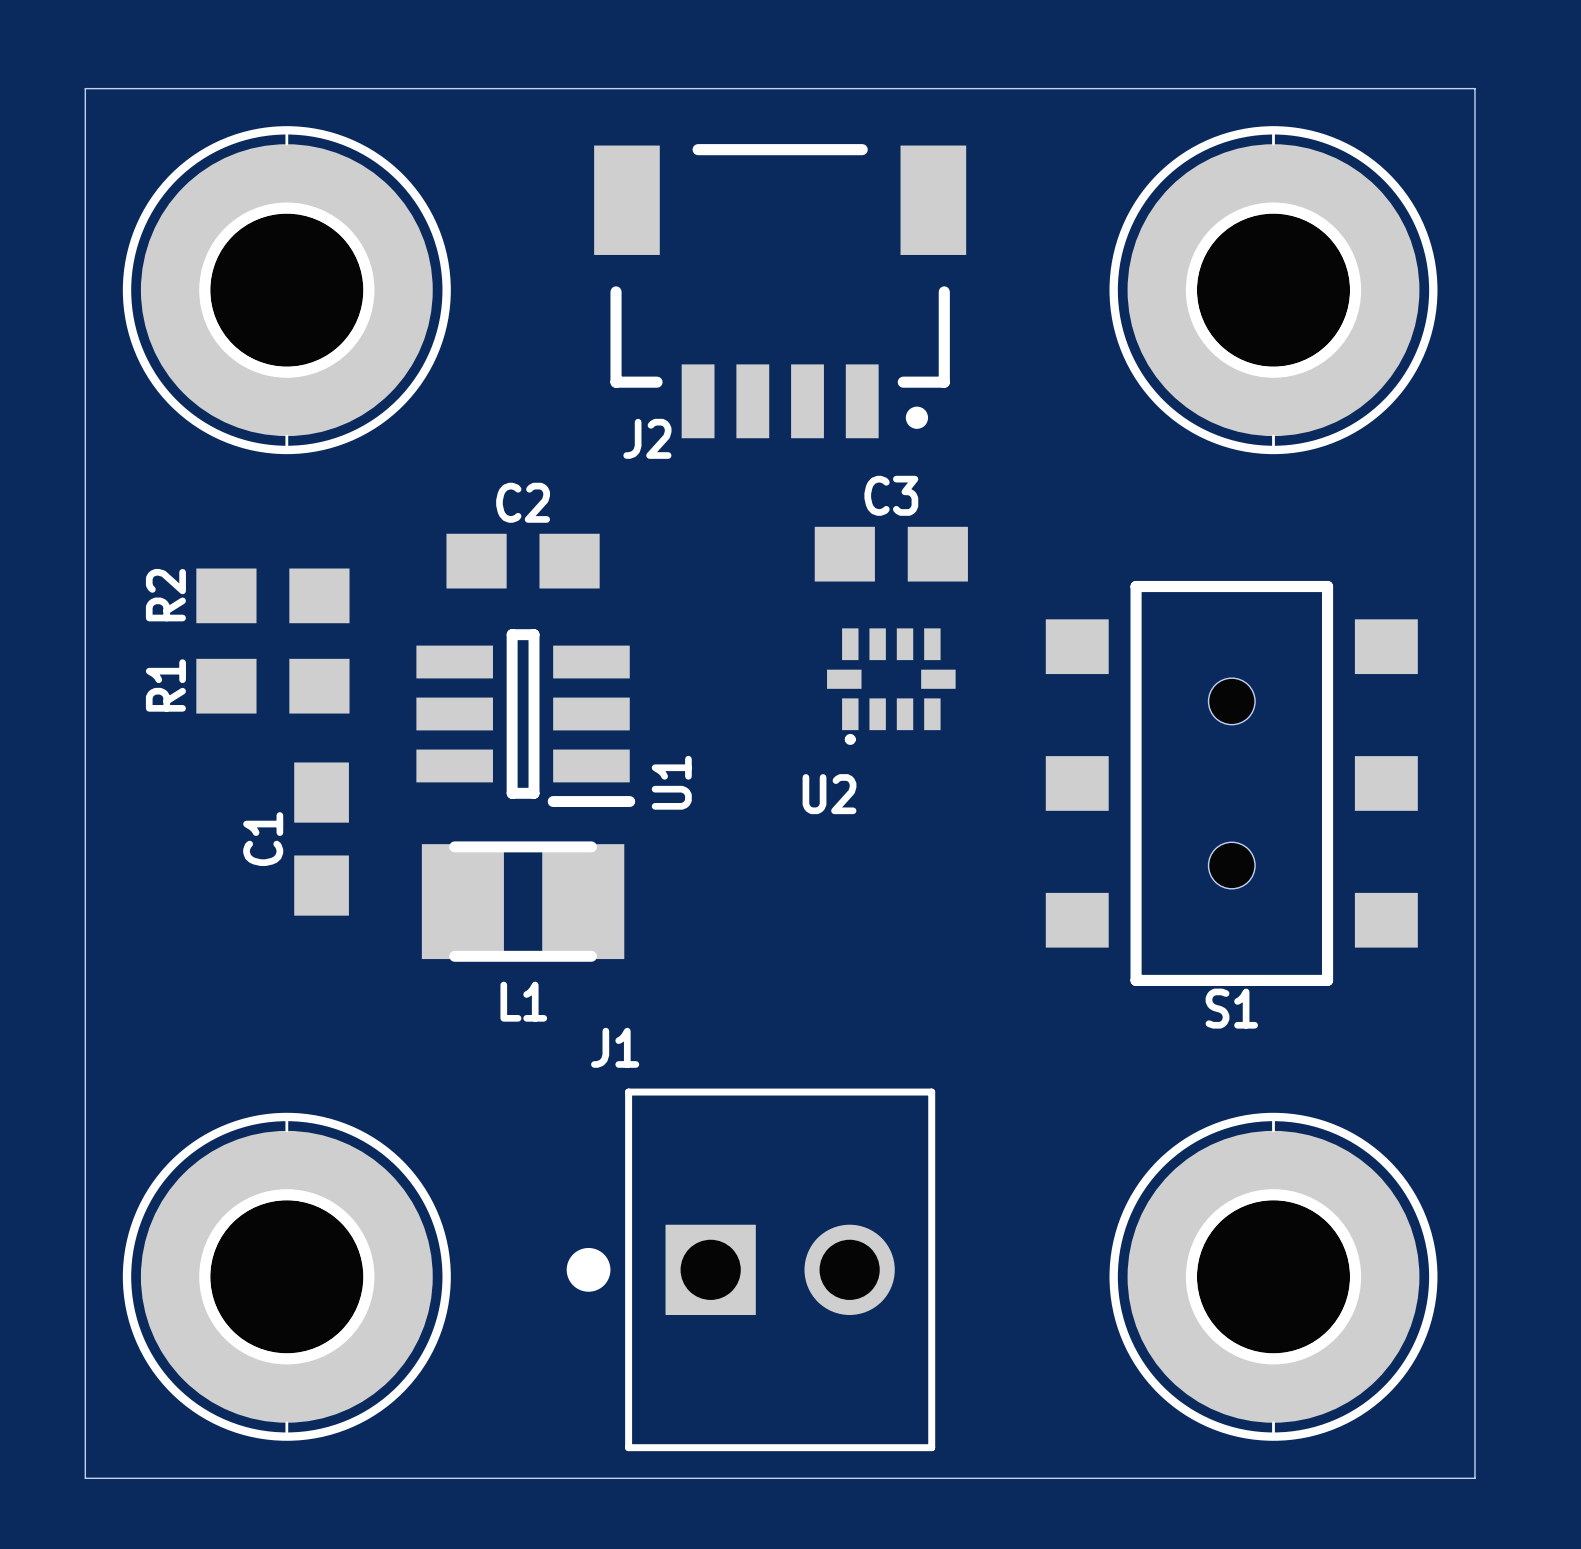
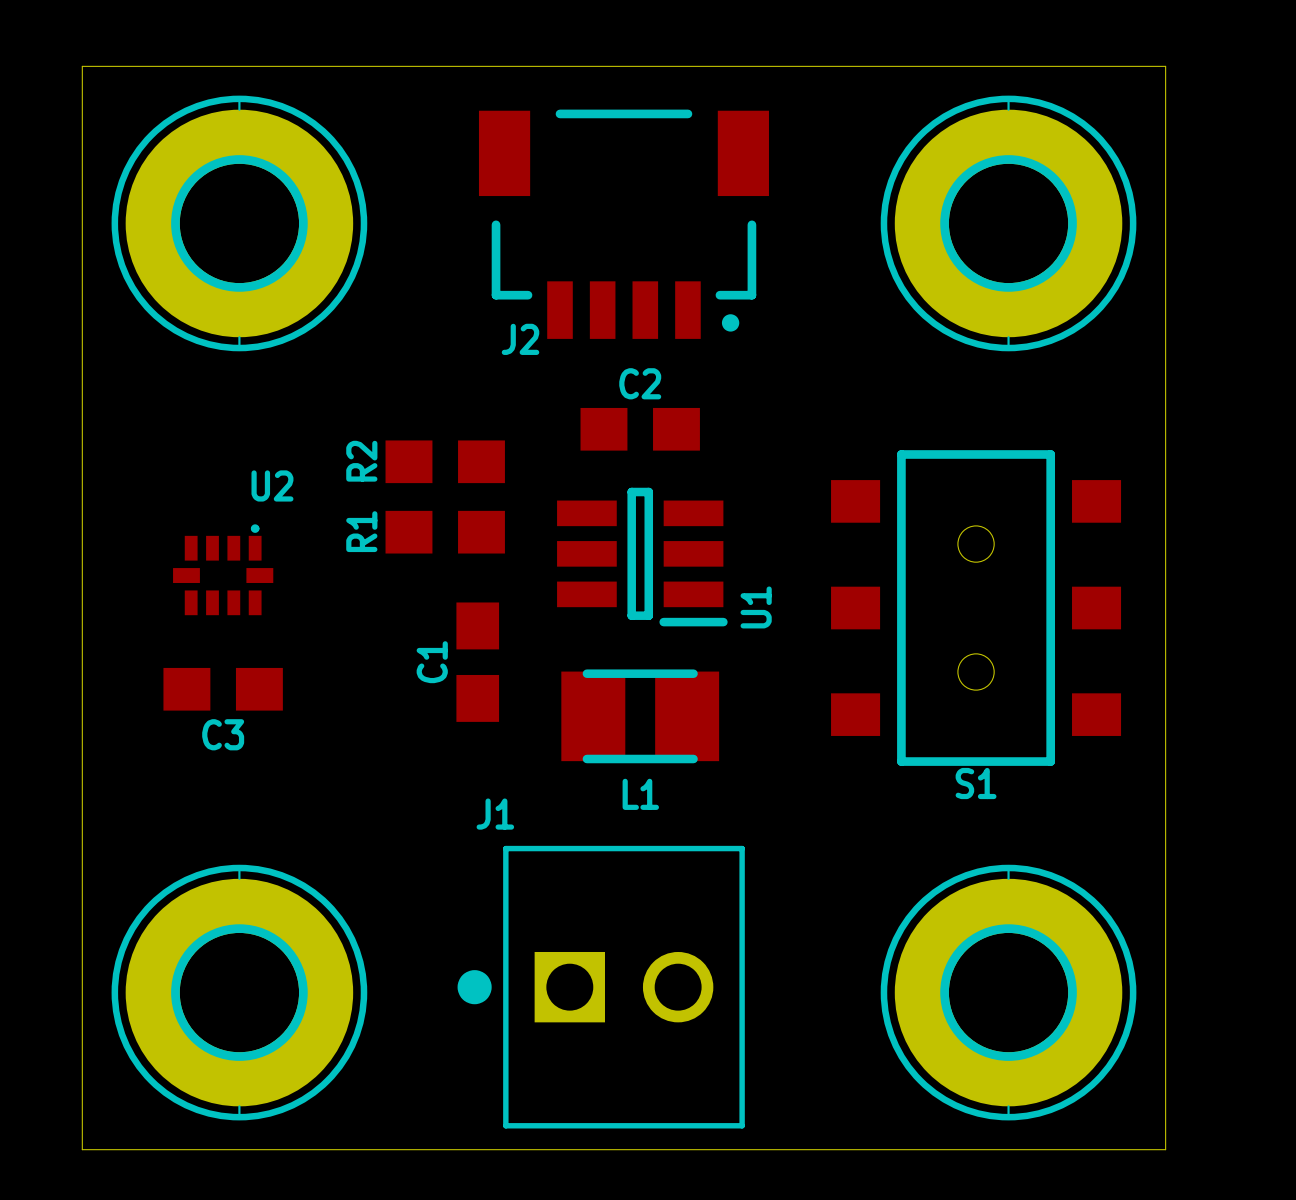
C3 name position: C3 (891, 495) -> C3 (223, 734)
C3 position: (891, 554) -> (223, 689)
C2 position: (523, 561) -> (640, 429)
R2 position: (272, 595) -> (445, 461)
R1 position: (272, 686) -> (445, 532)
U2 rotation: 0° (891, 686) -> 180° (223, 569)
U2 position: (891, 686) -> (223, 569)
U1 position: (525, 718) -> (642, 557)
C1 position: (321, 839) -> (477, 662)
L1 position: (523, 901) -> (640, 716)

